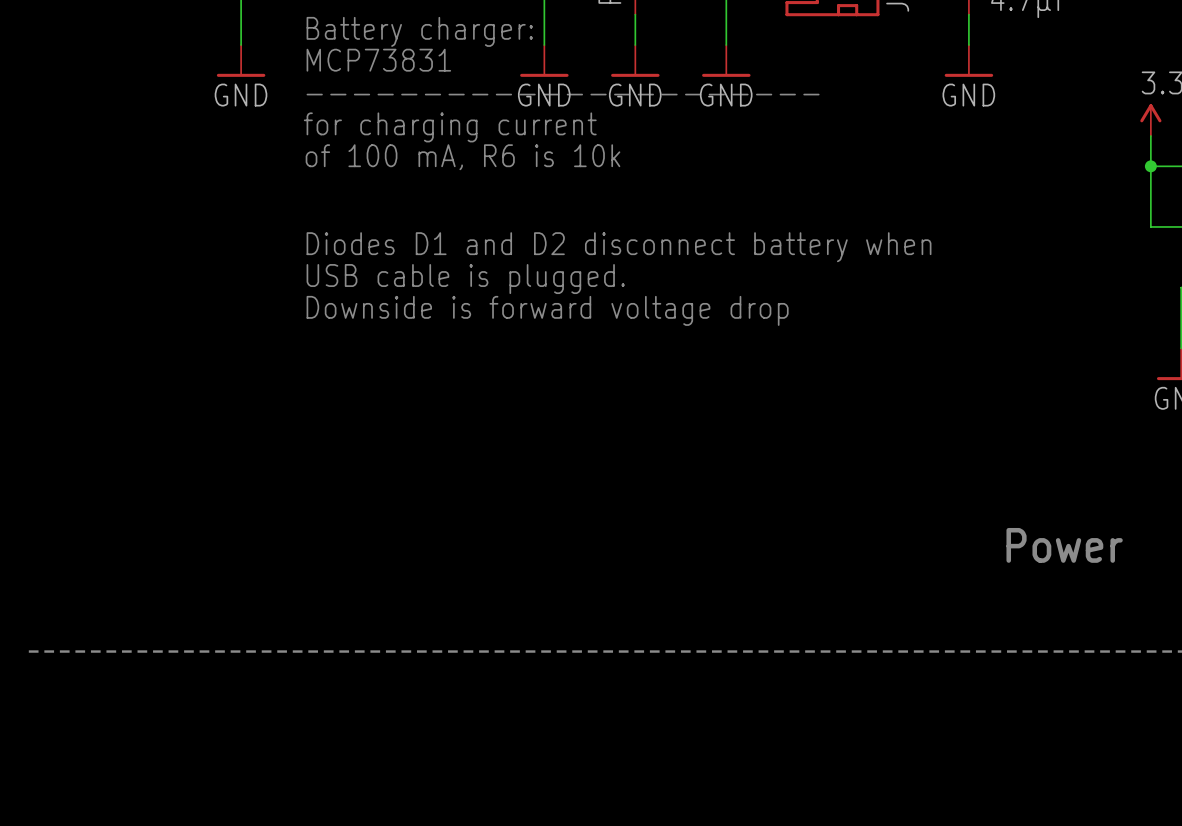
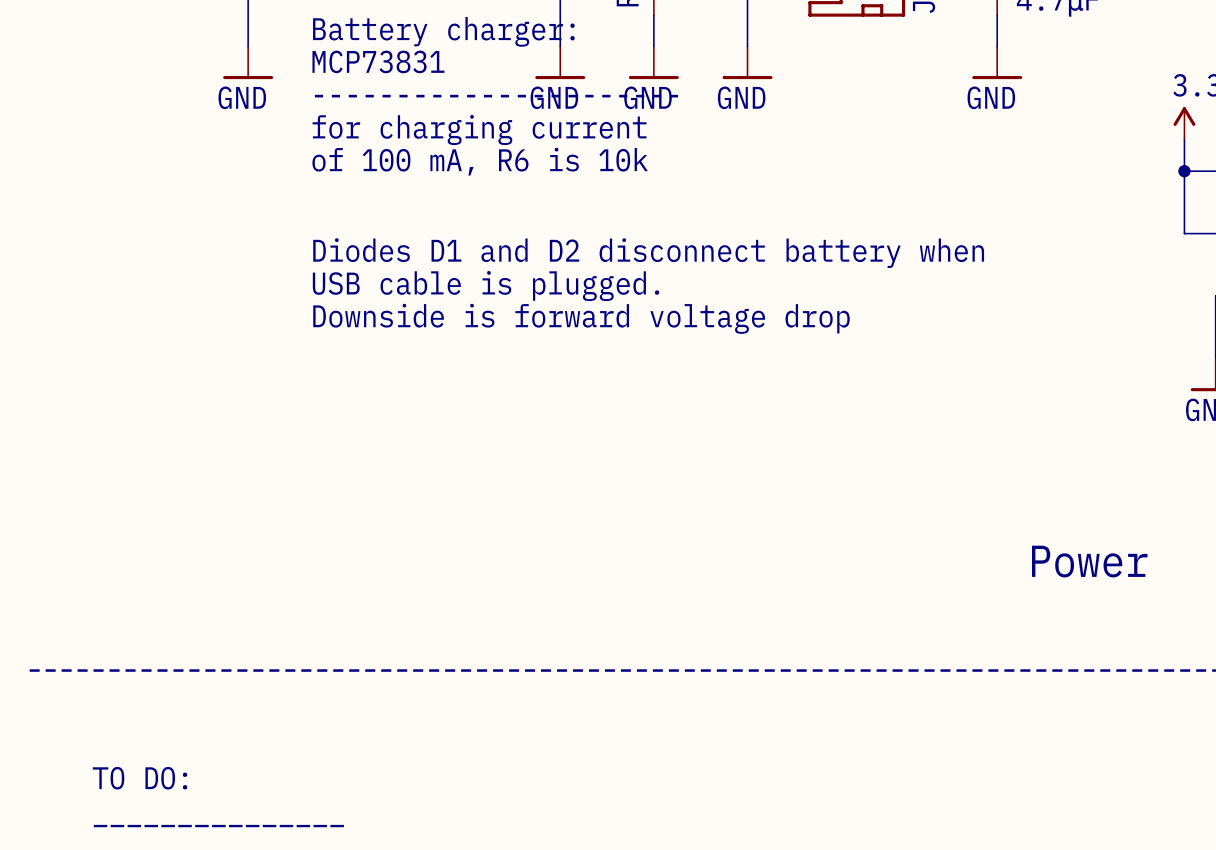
text: none -> TO DO: (139, 778)
text: none -> _______________ (218, 826)

